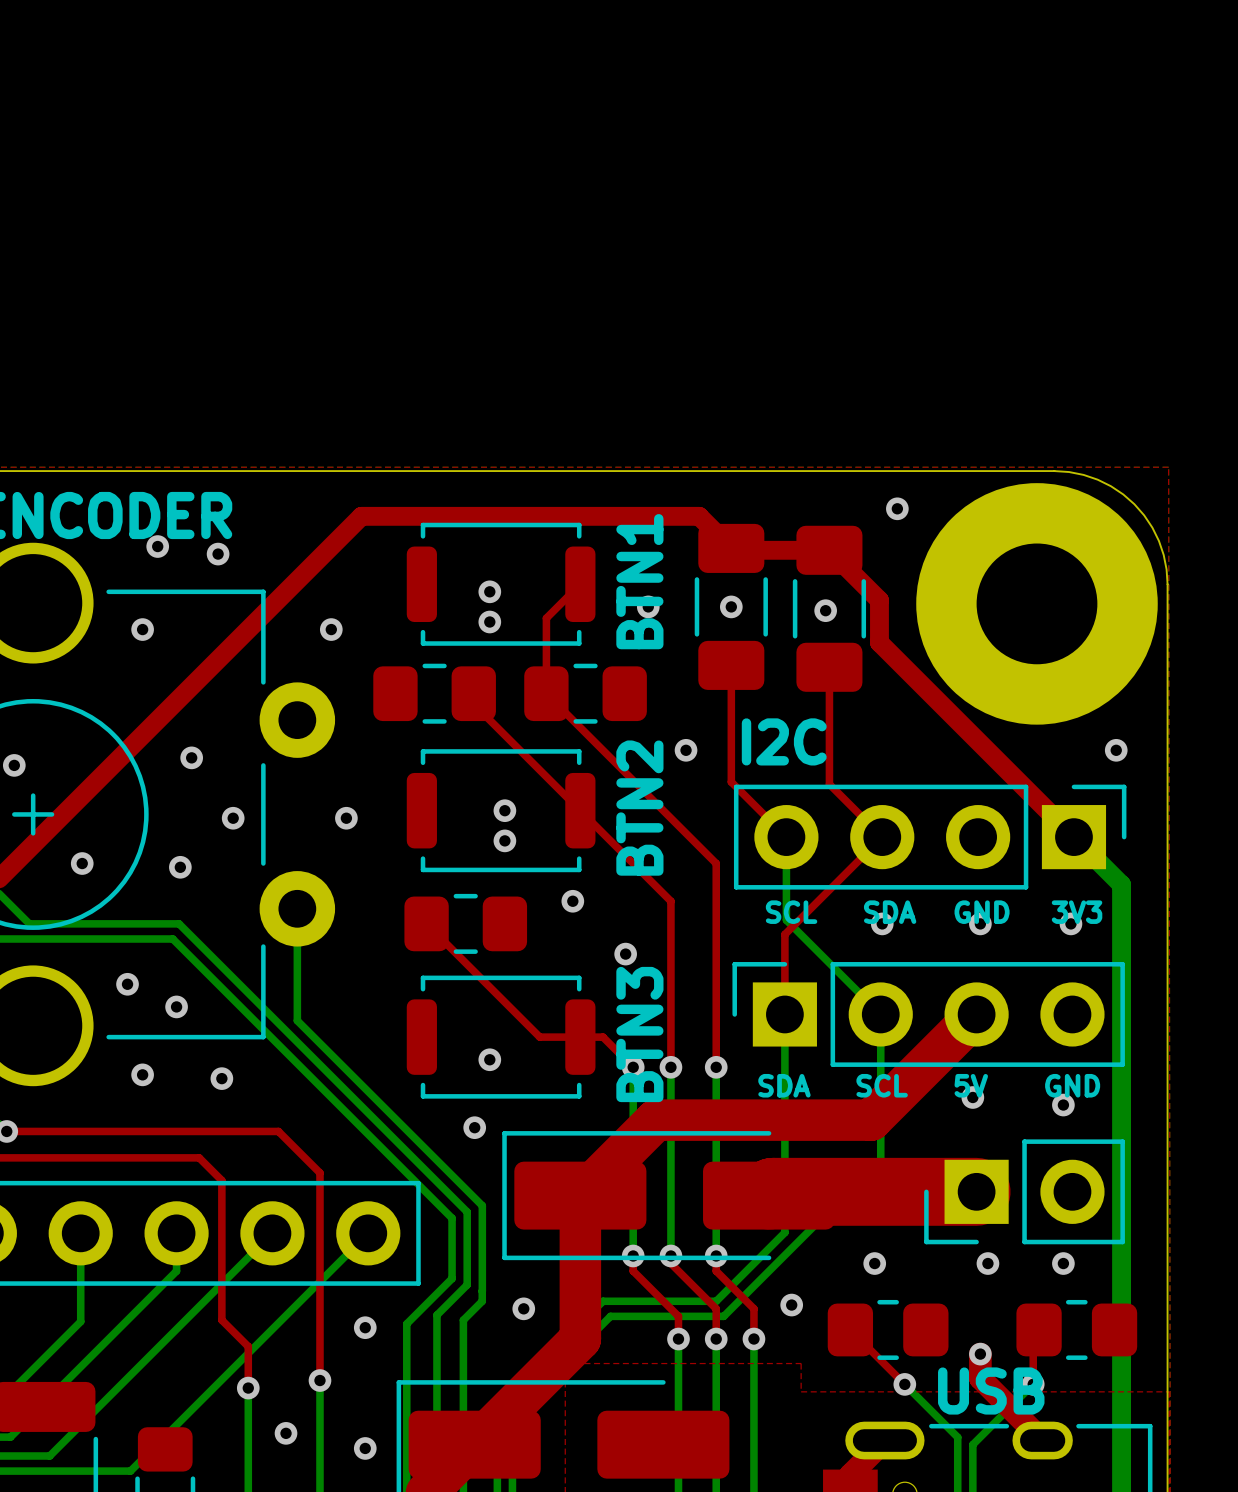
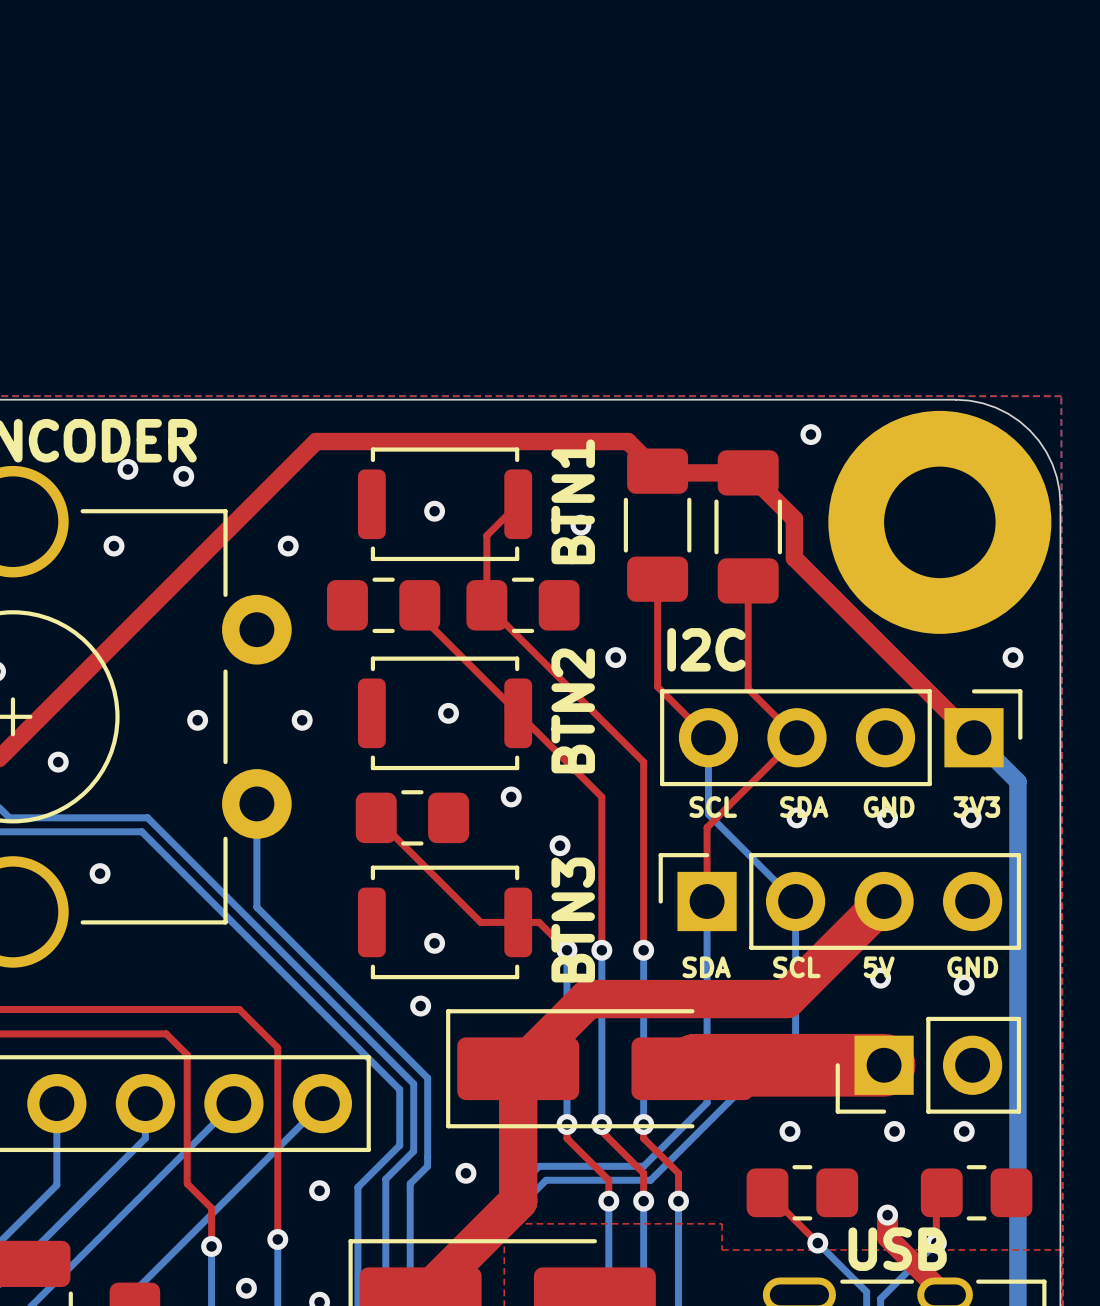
via: (731, 606) -> none
via: (825, 610) -> none
via: (489, 622) -> none
via: (191, 757) -> none
via: (504, 840) -> none
via: (180, 867) -> none
via: (176, 1006) -> none
via: (142, 1074) -> none
via: (221, 1078) -> none
via: (791, 1305) -> none

